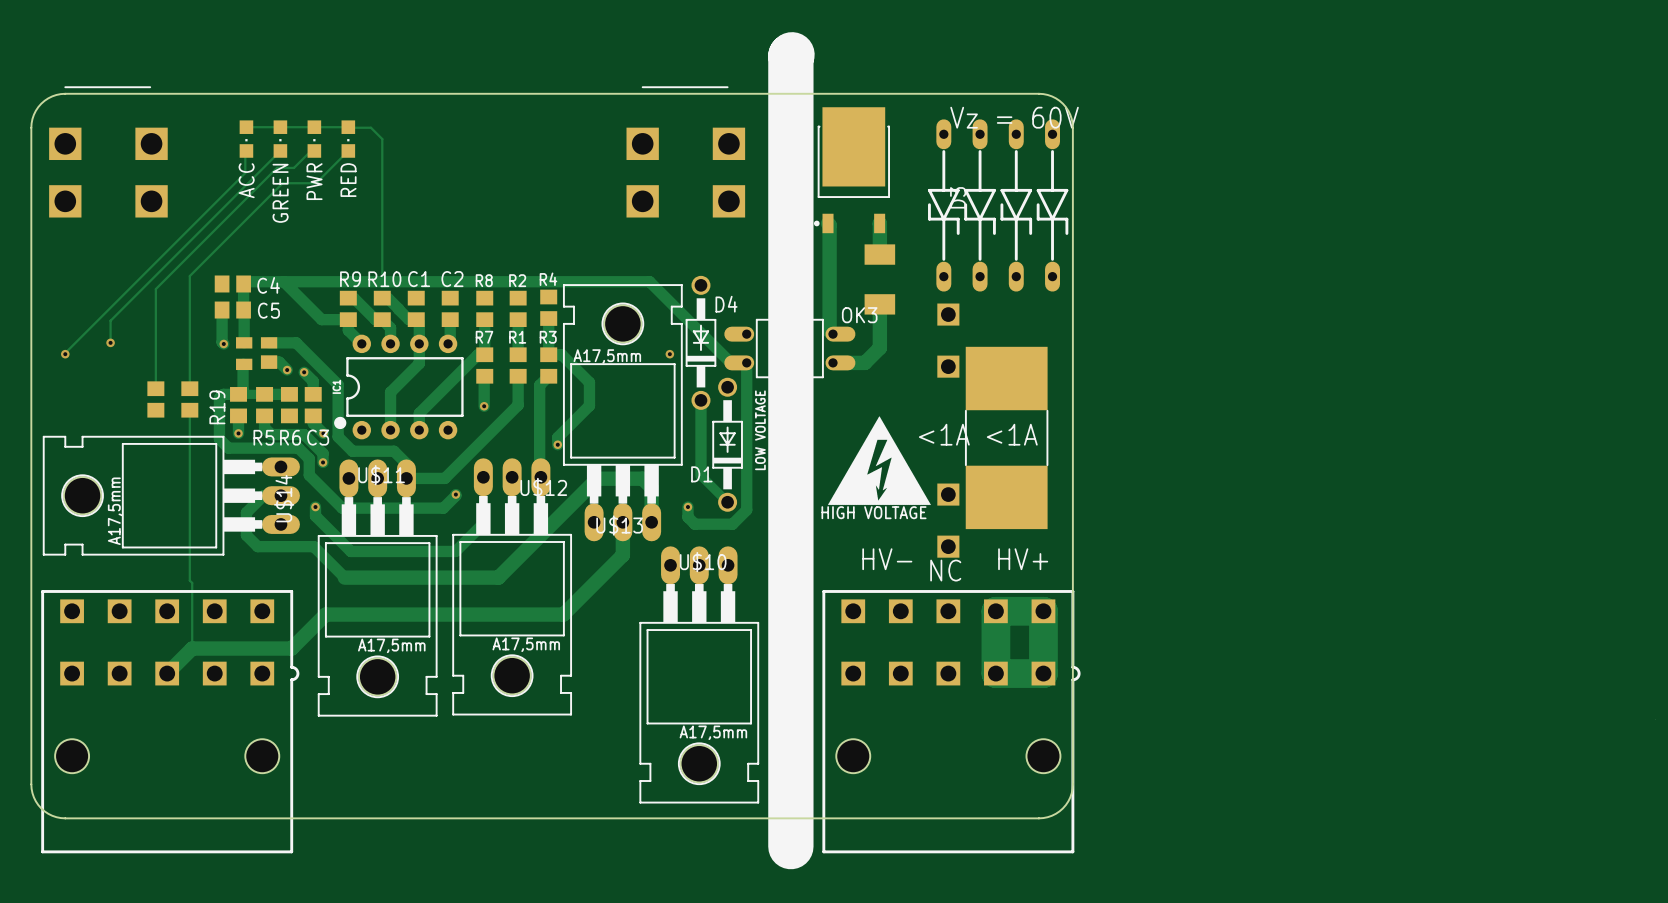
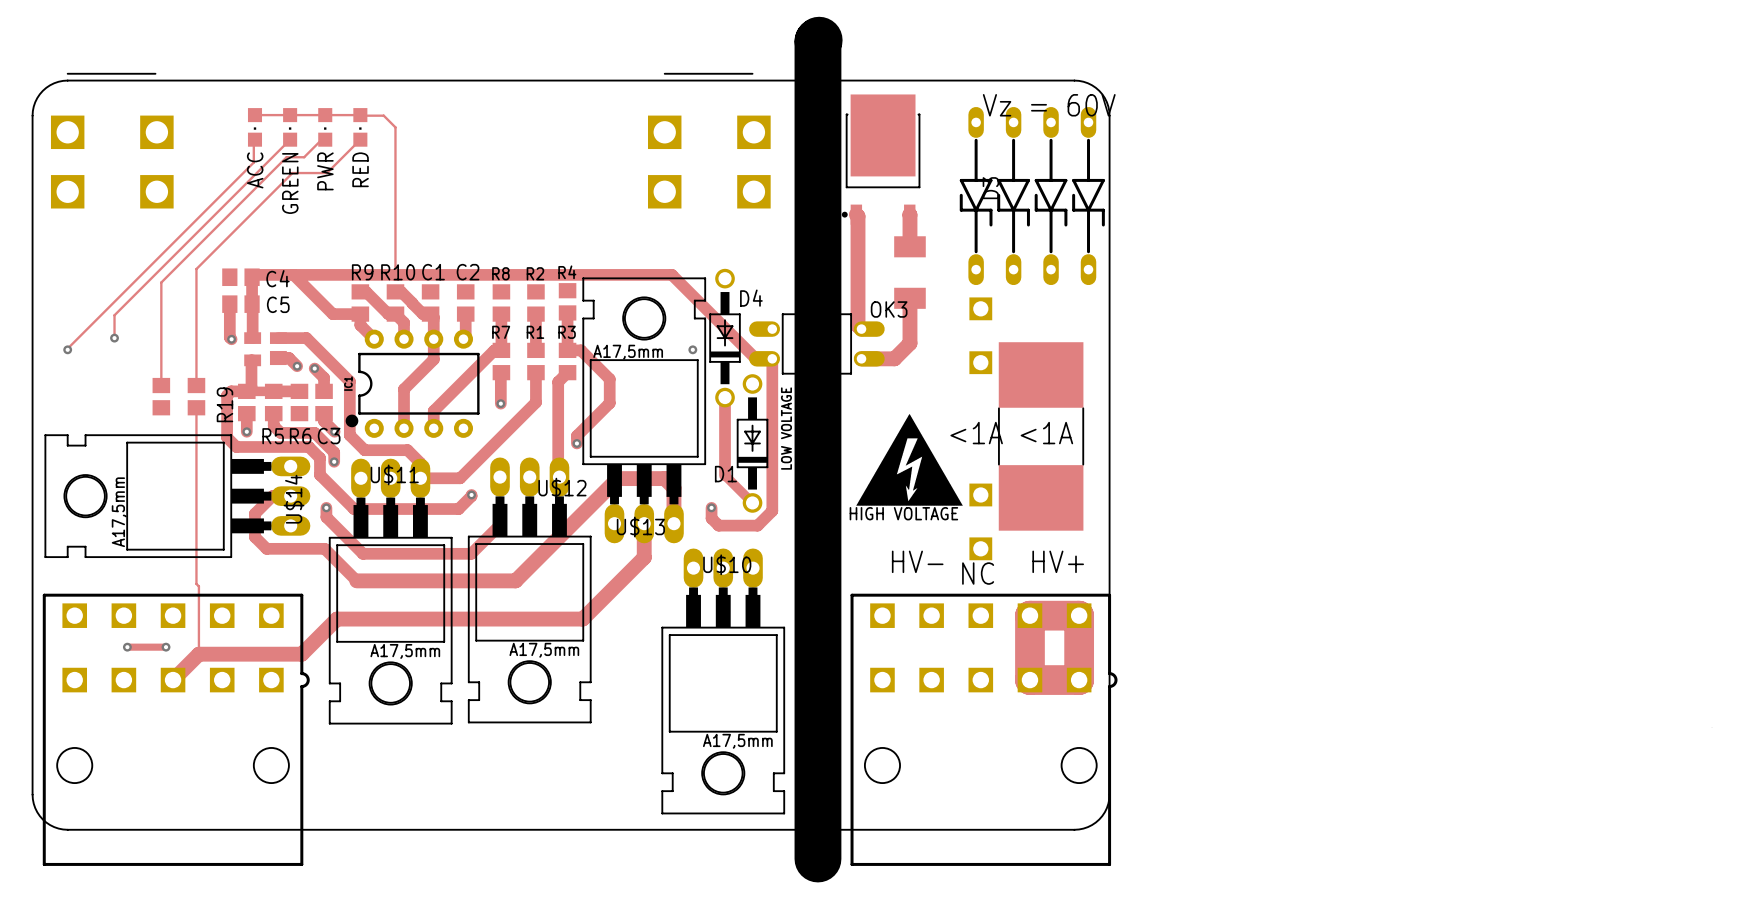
track: none -> (127, 647) (166, 647)
via: none -> (127, 647)
via: none -> (166, 647)

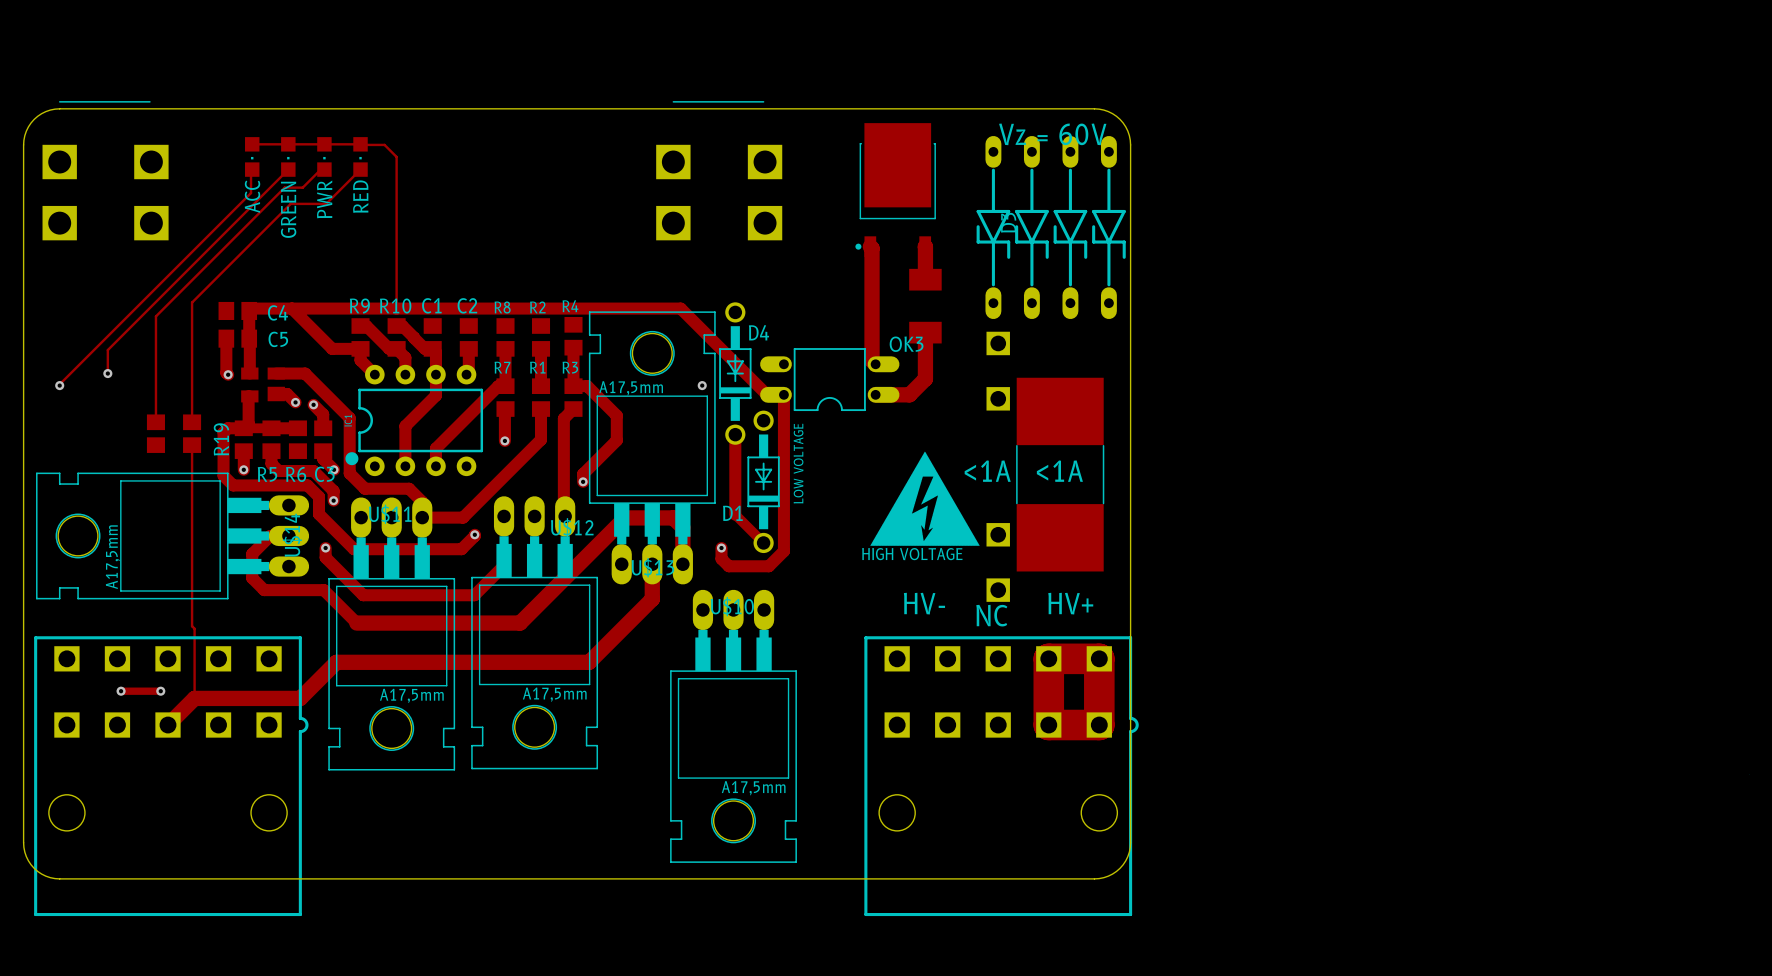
line: (819, 40) (817, 859) -> none

